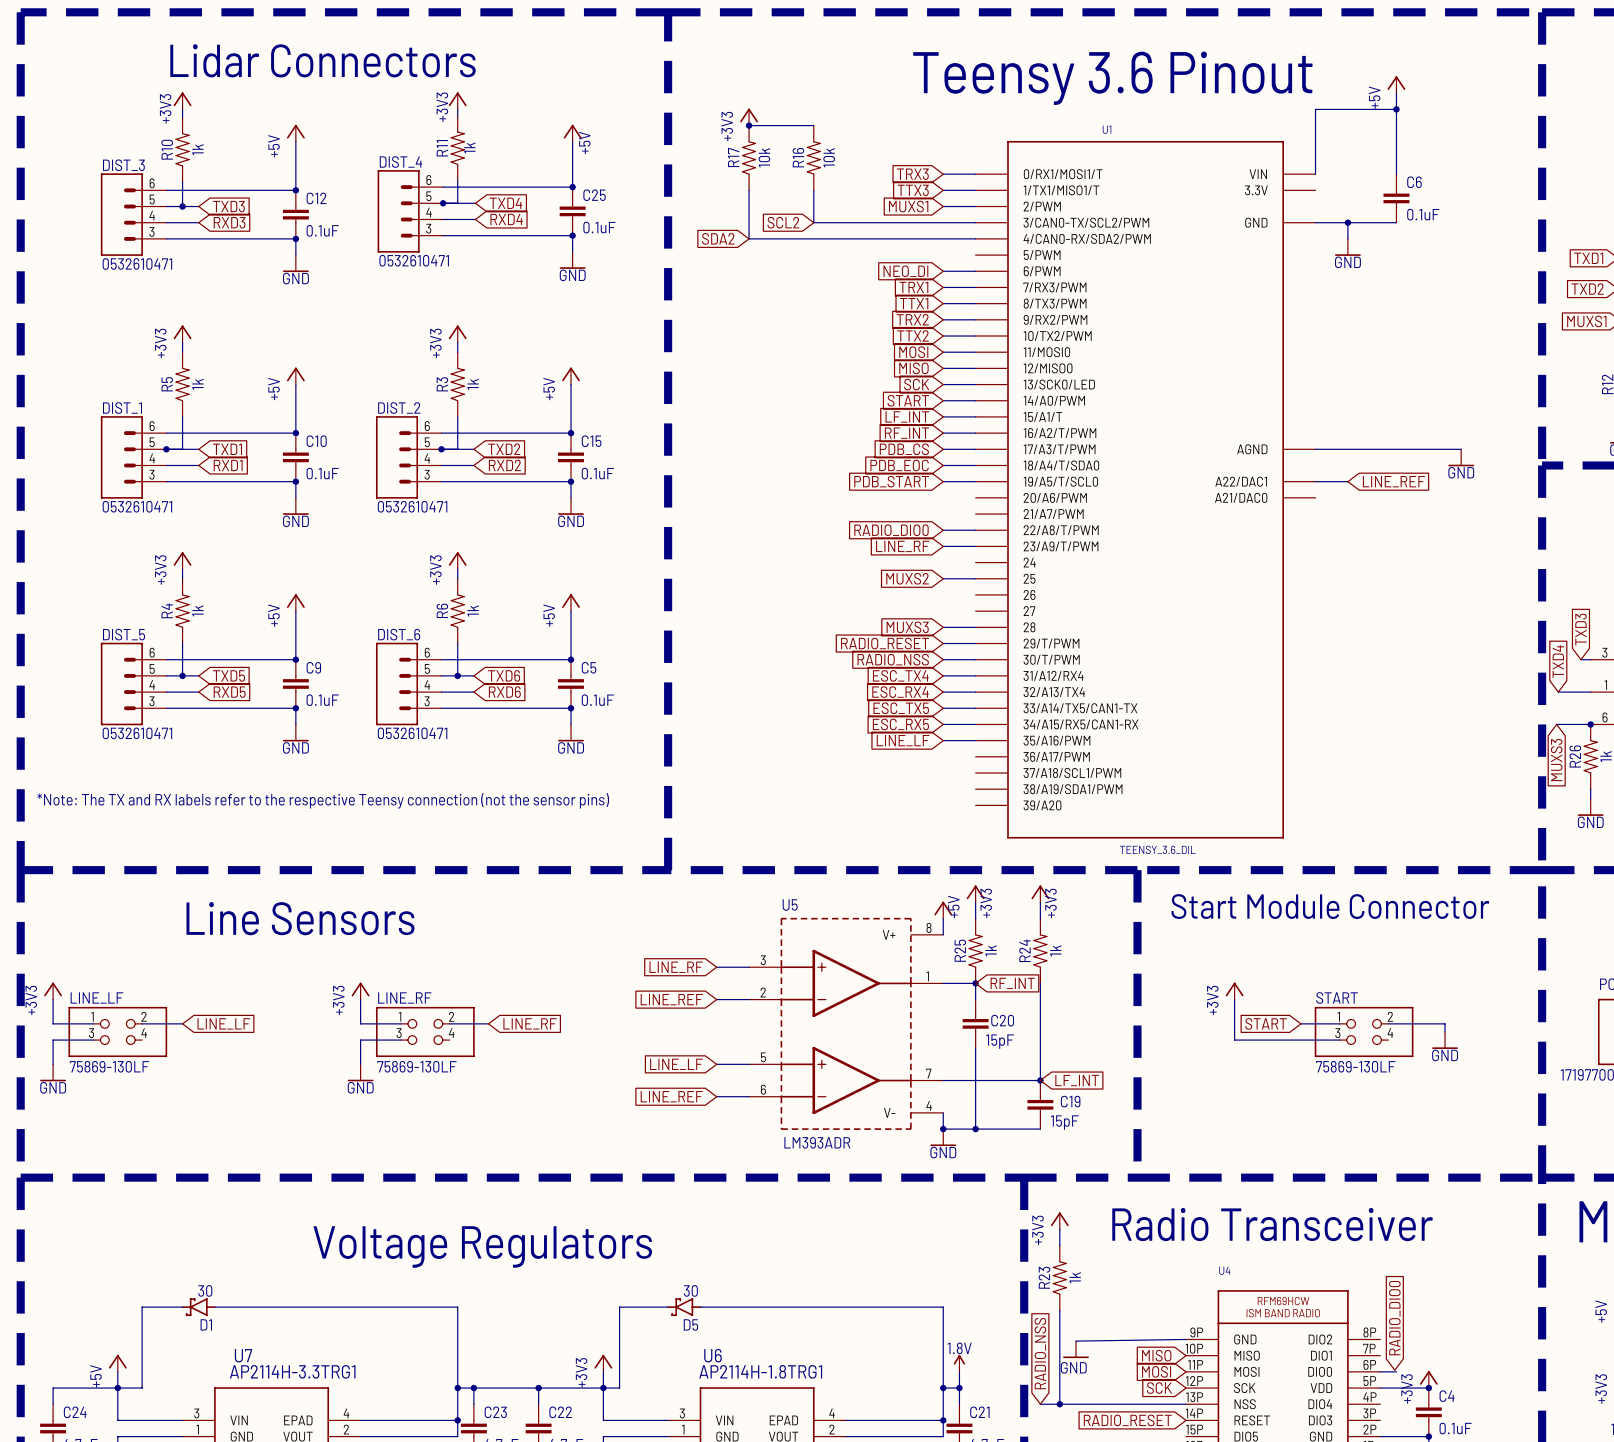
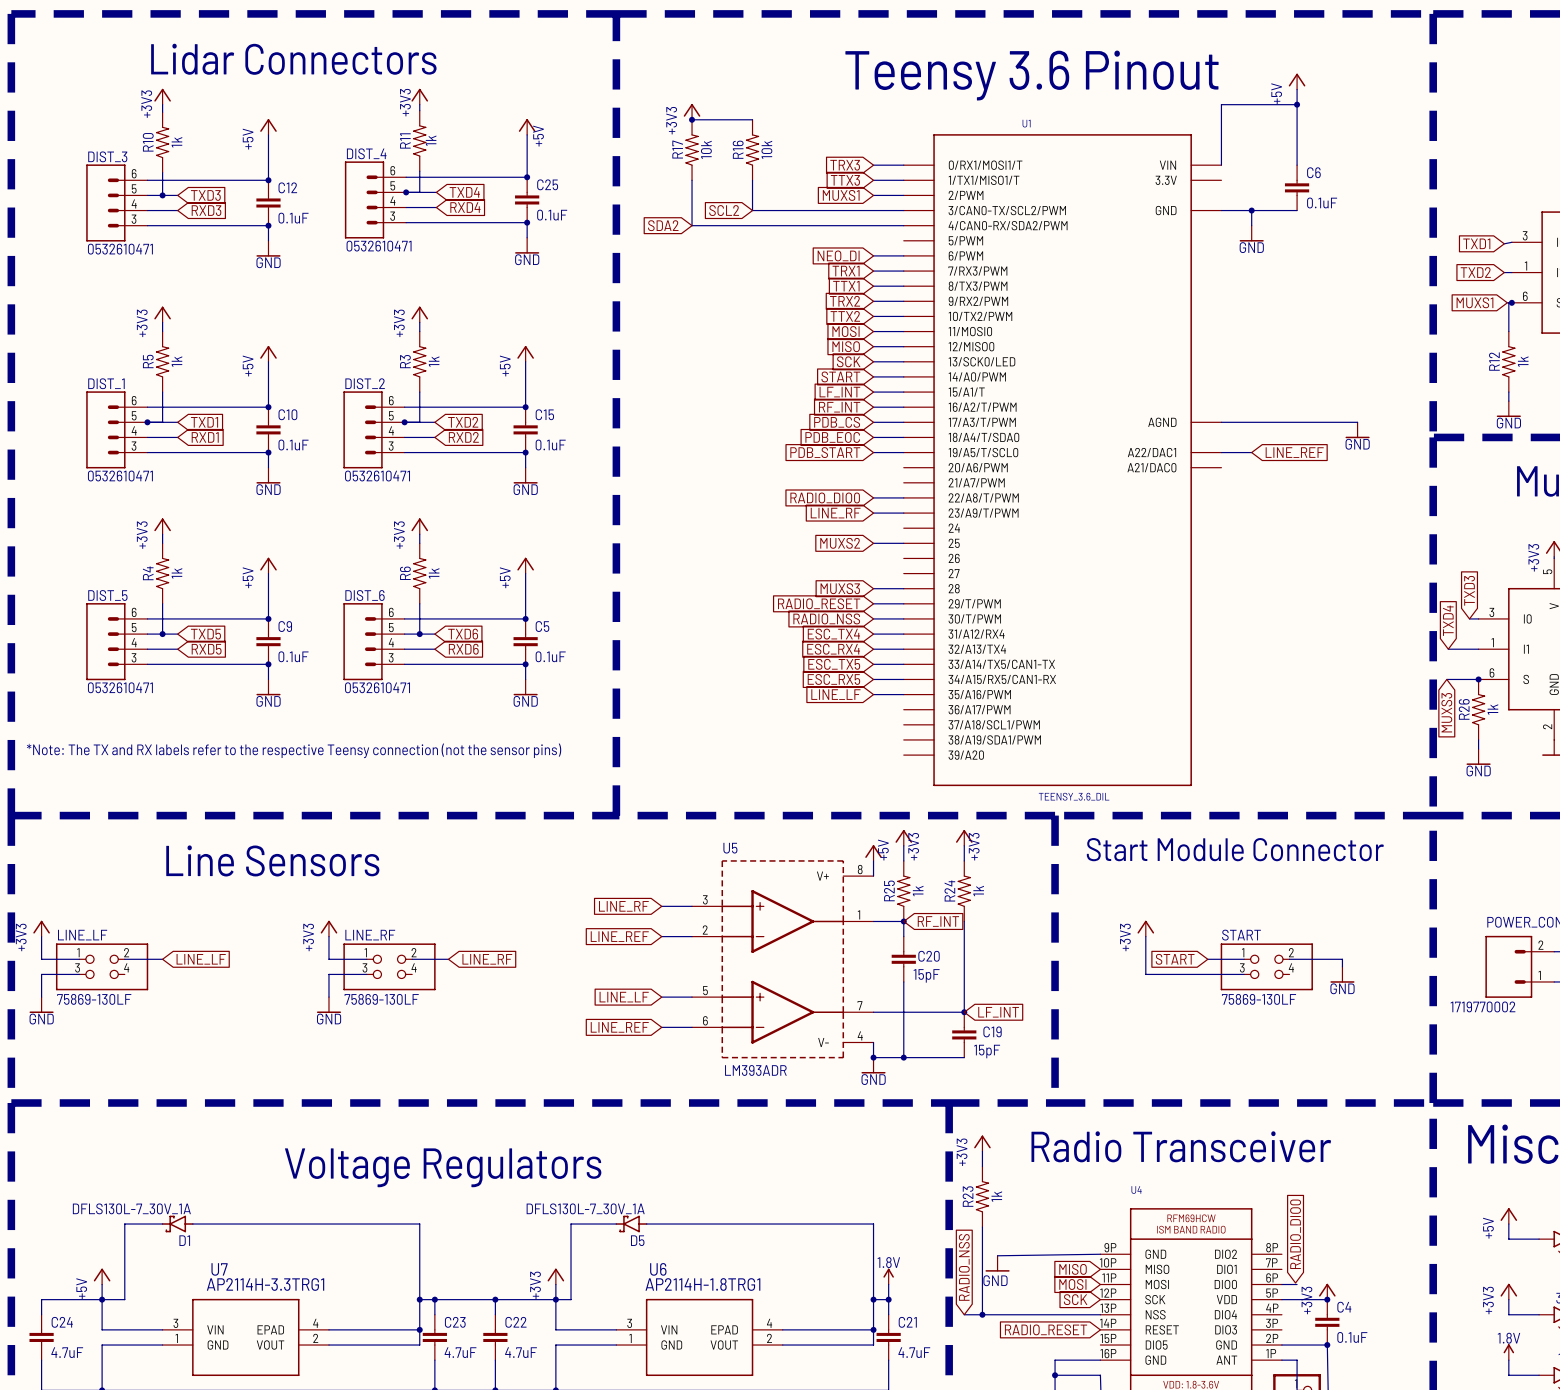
D1 value: 30 (205, 1290) -> DFLS130L-7_30V_1A (131, 1208)
D5 value: 30 (690, 1290) -> DFLS130L-7_30V_1A (585, 1208)

